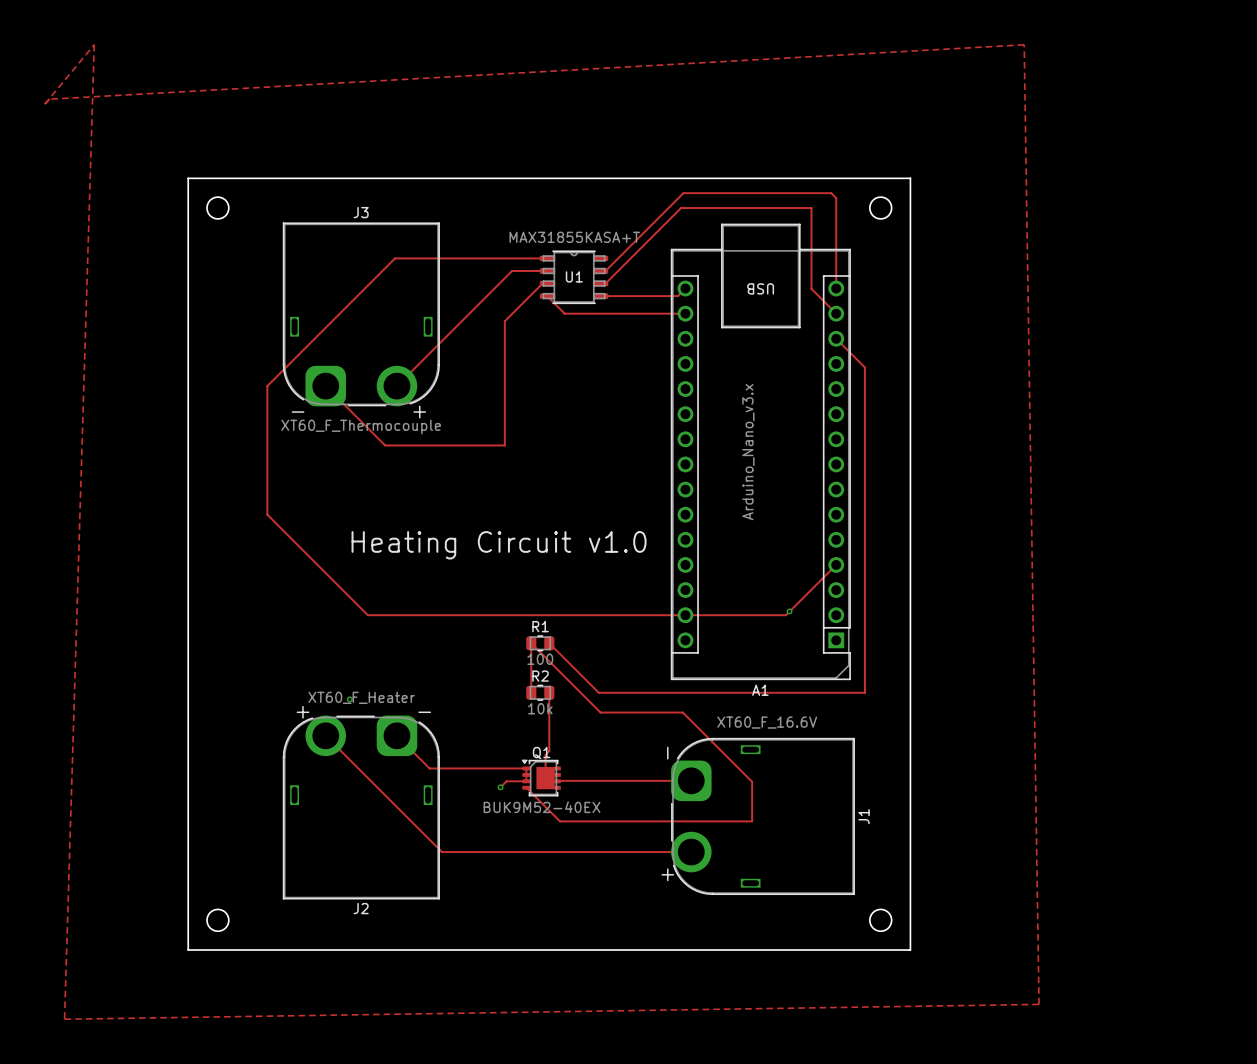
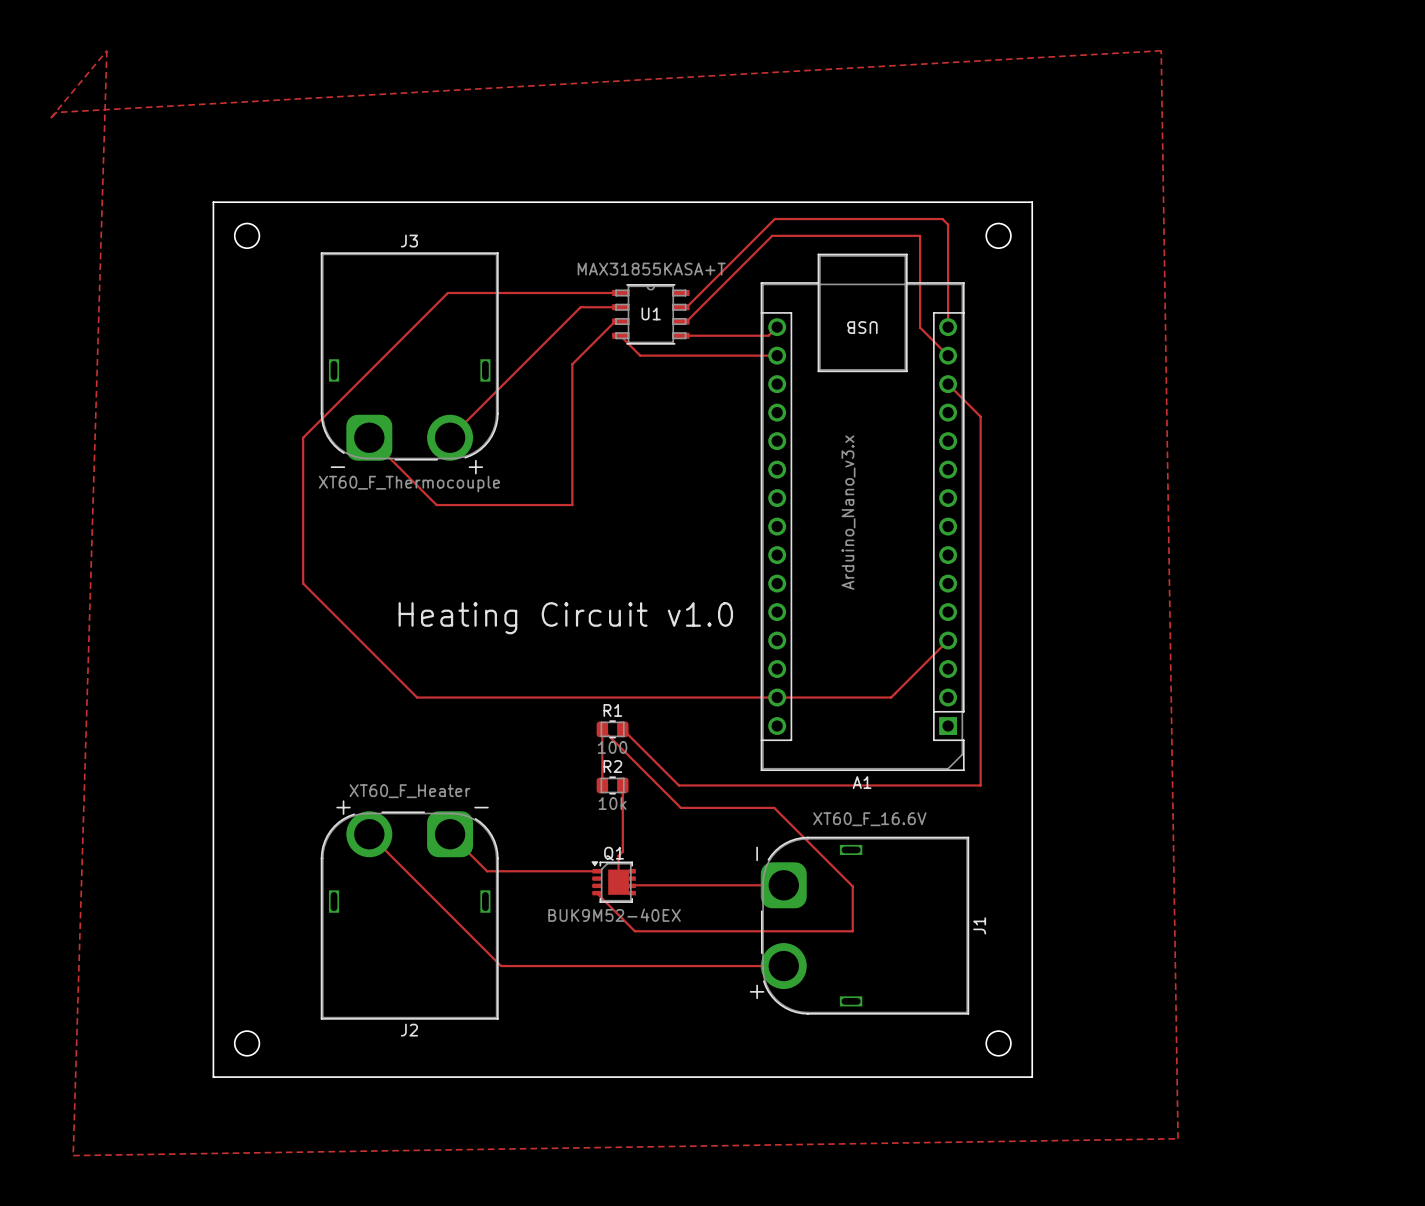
via: (789, 611) -> none
via: (349, 699) -> none
track: (526, 768) (526, 781) (506, 781) (500, 787) -> none
via: (500, 787) -> none

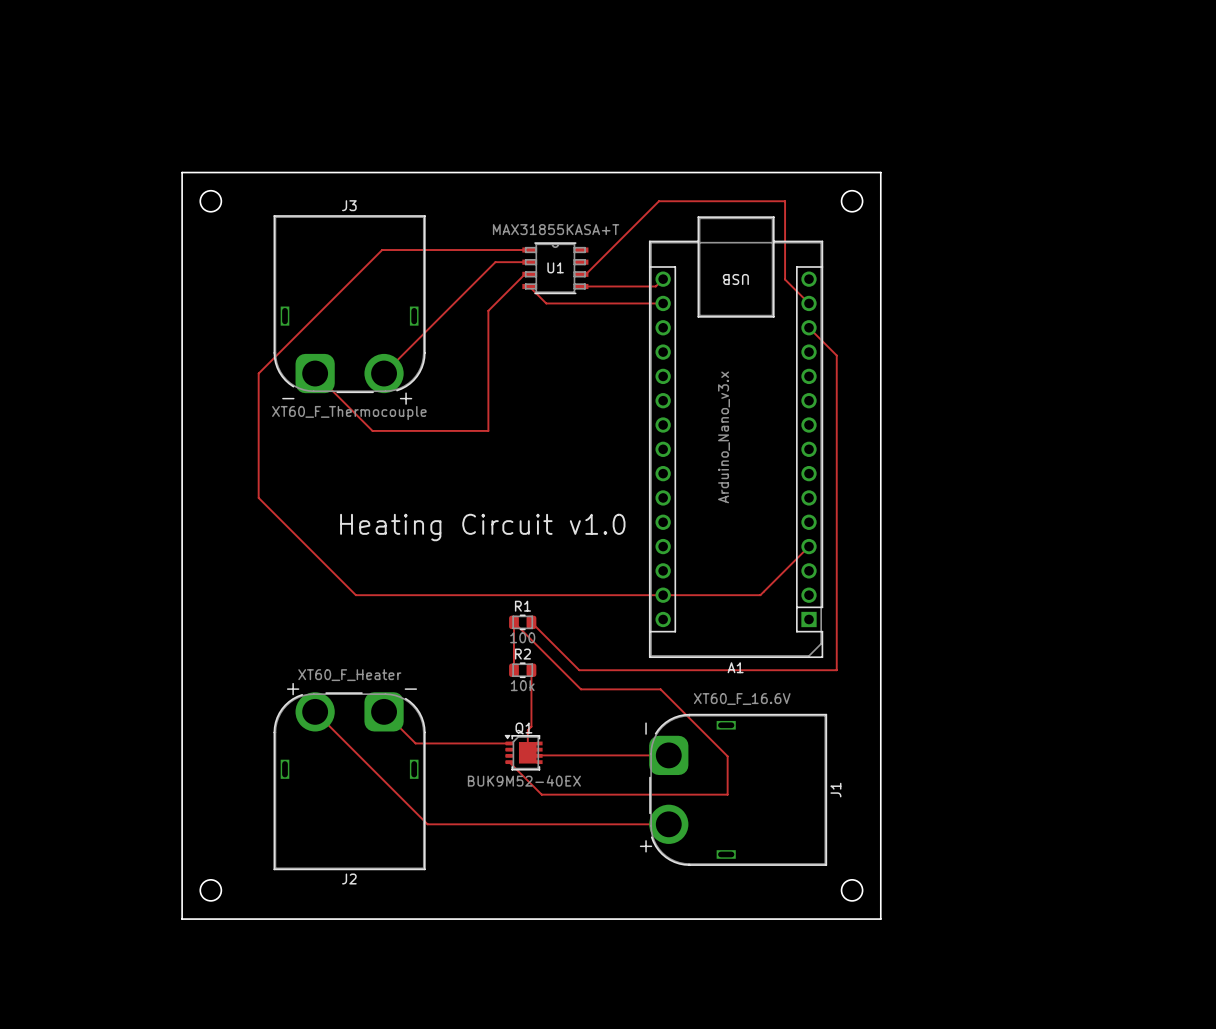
zone outline: (106, 50) (73, 1155) (1178, 1138) (1161, 50) (56, 112) (50, 118) (106, 50) -> none
track: (681, 307) (686, 307) (774, 219) (942, 219) (948, 224) (948, 327) -> none

